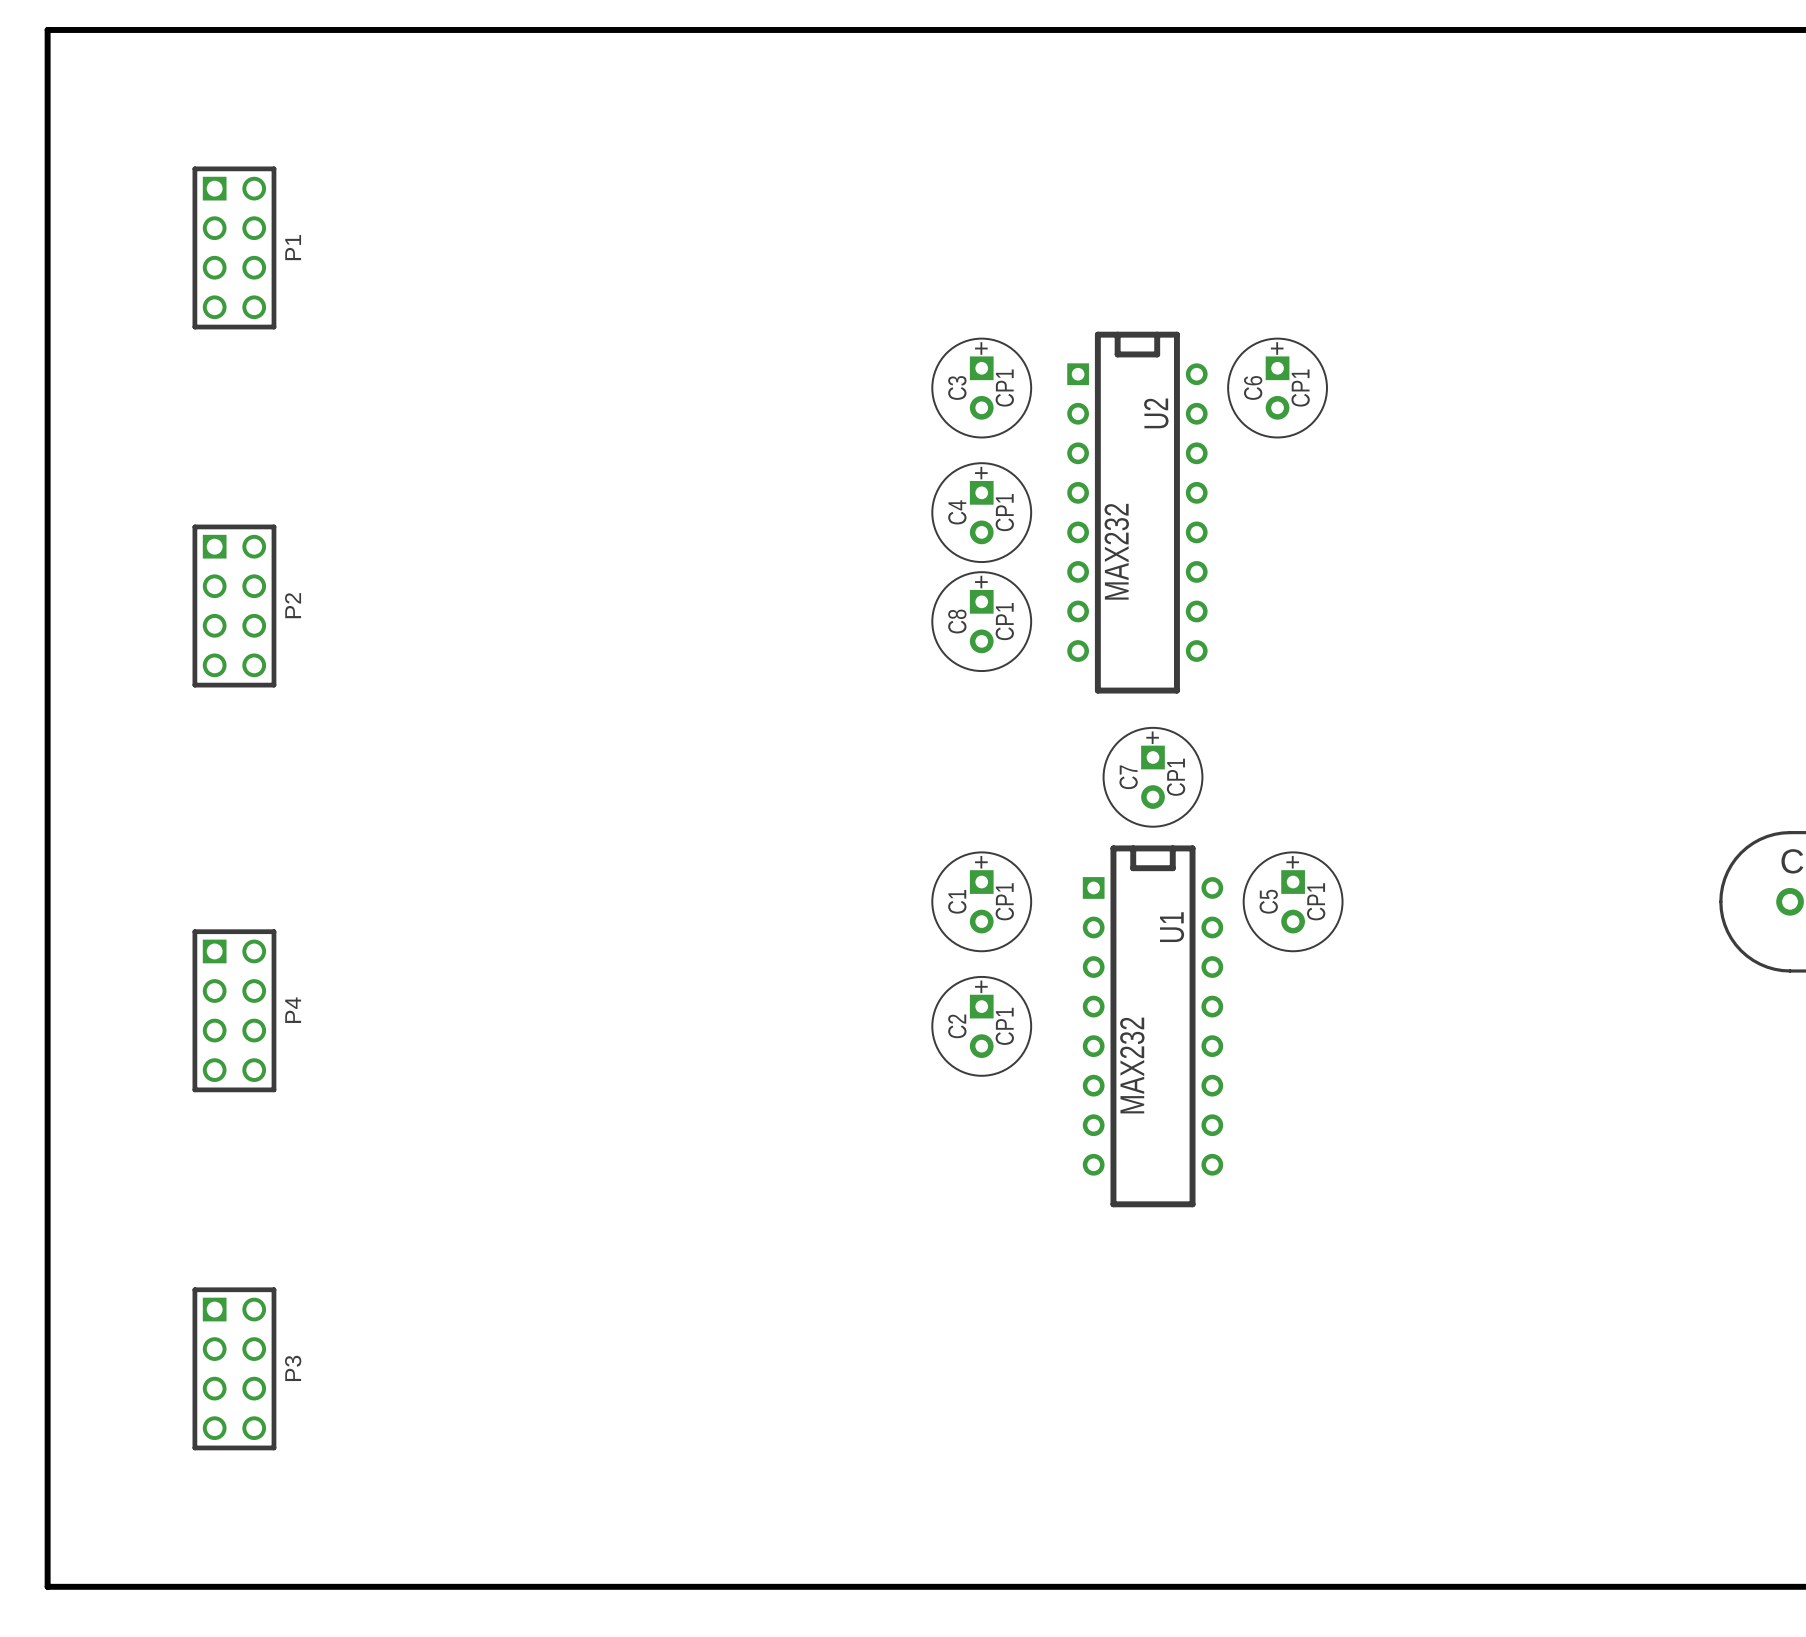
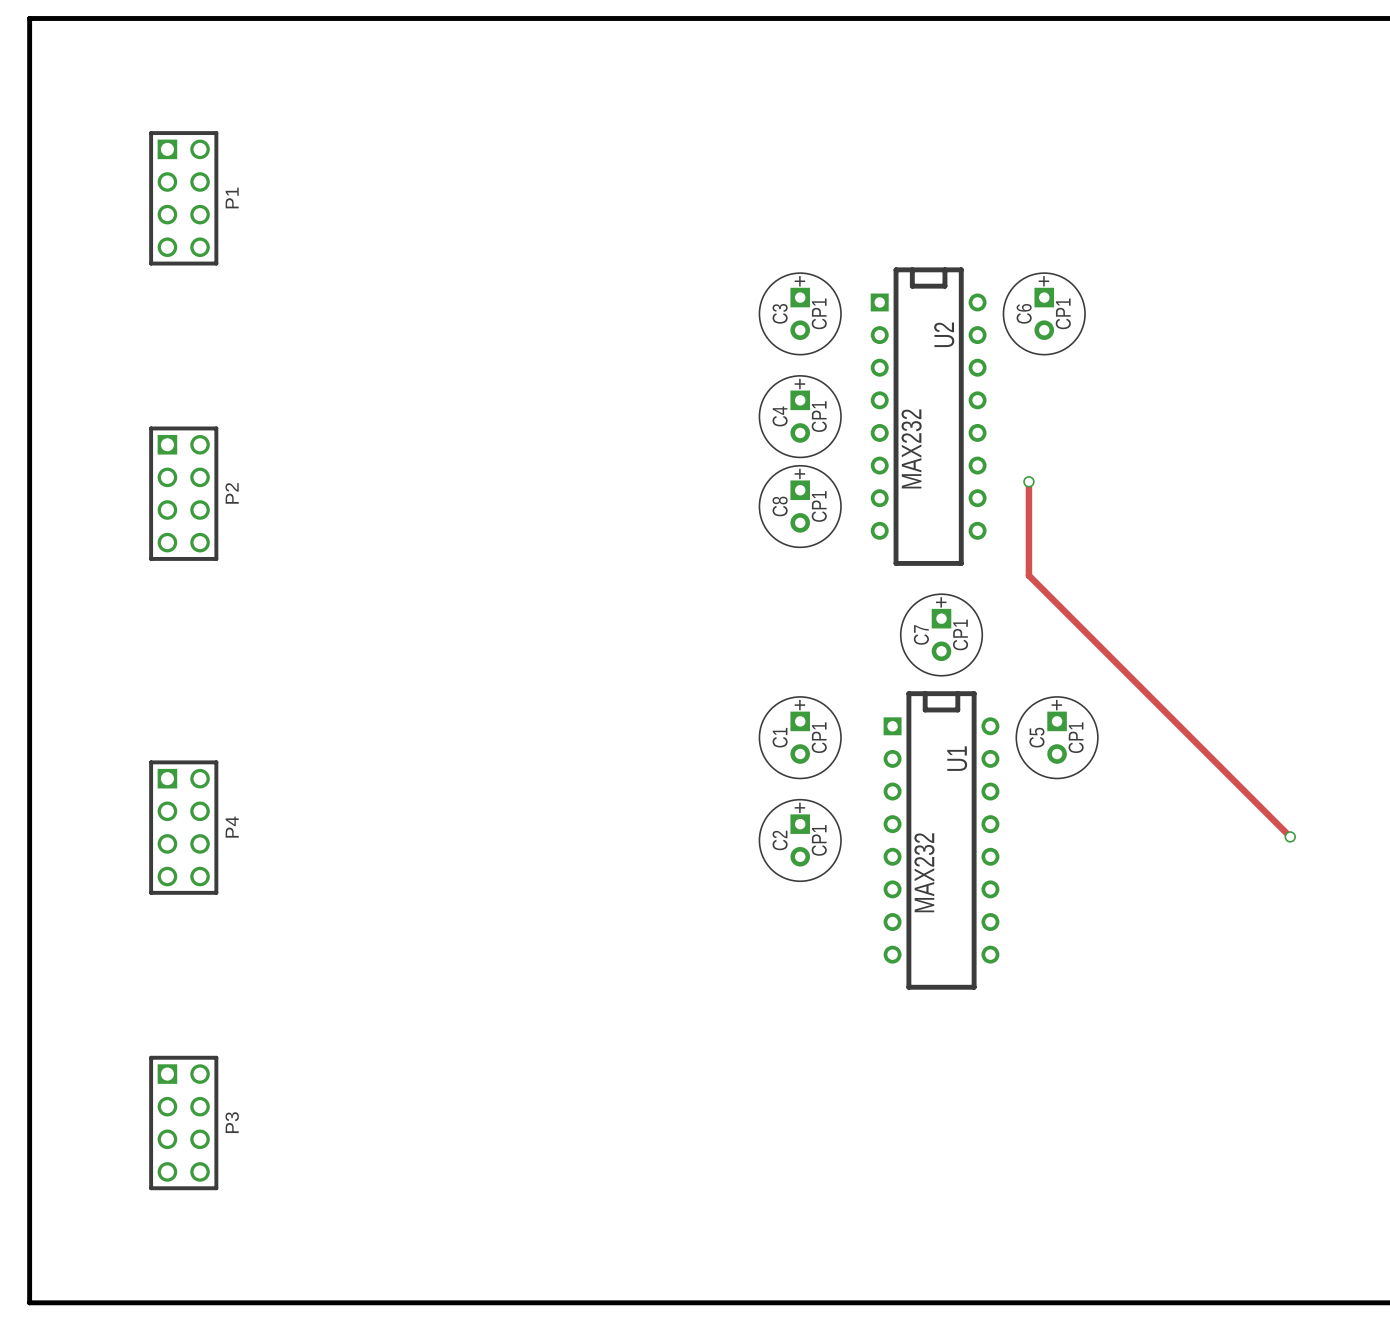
track: none -> (1028, 481) (1028, 575) (1290, 836)
via: none -> (1028, 481)
via: none -> (1290, 836)

